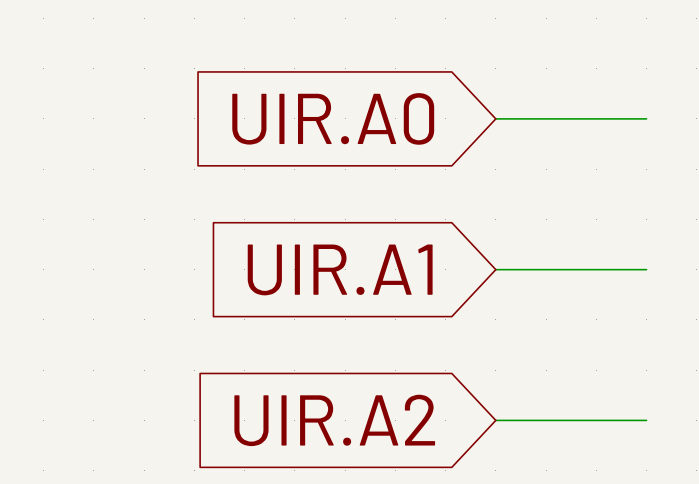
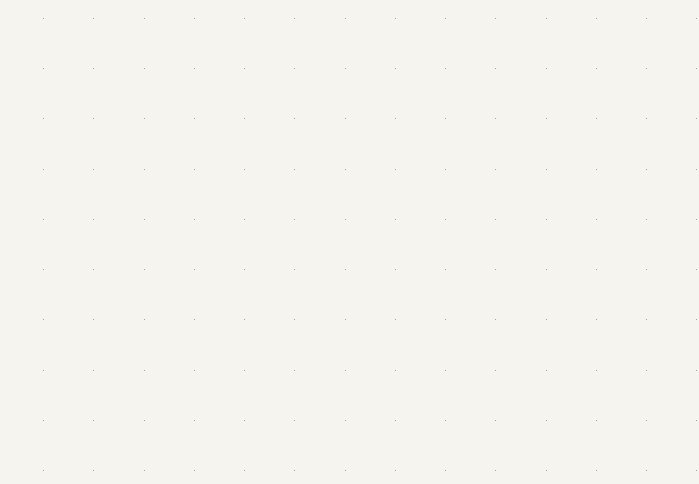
global label: UIR.A0 (333, 118) -> none
wire: (495, 118) (646, 118) -> none
global label: UIR.A1 (340, 269) -> none
wire: (495, 269) (646, 269) -> none
global label: UIR.A2 (334, 420) -> none
wire: (495, 420) (646, 420) -> none

